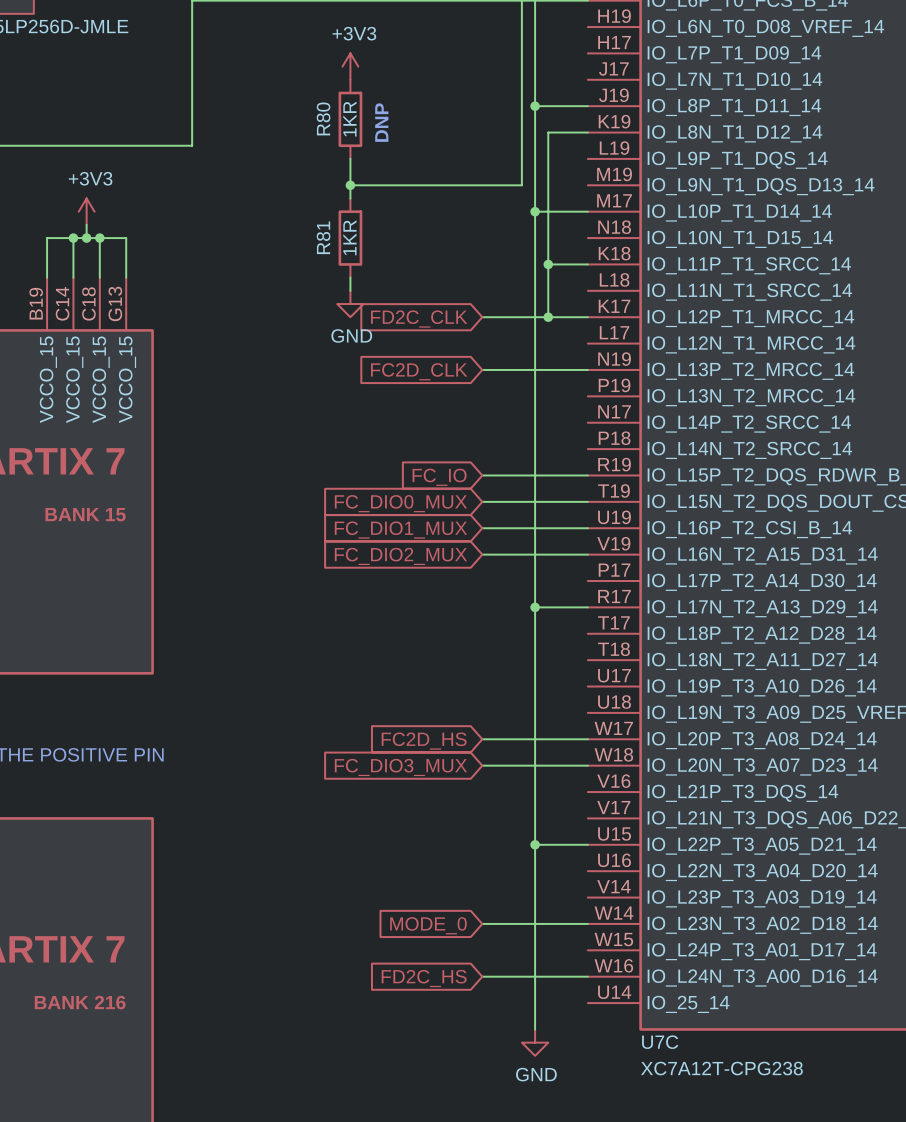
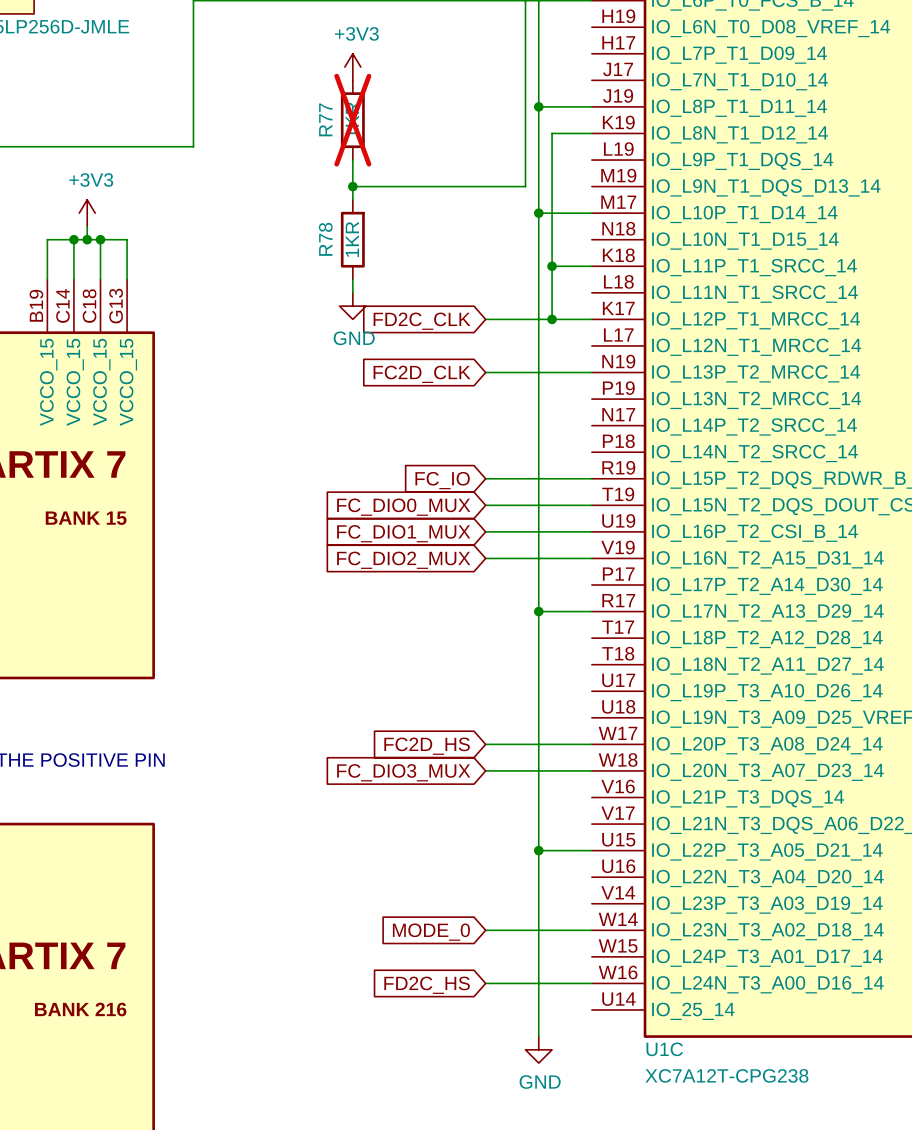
R80 name: R80 (323, 118) -> R77 (325, 119)
R80 do-not-place cross: none -> (352, 120)
text: DNP (381, 122) -> none
R81 name: R81 (323, 237) -> R78 (325, 239)
U7C name: U7C (660, 1042) -> U1C (664, 1049)

